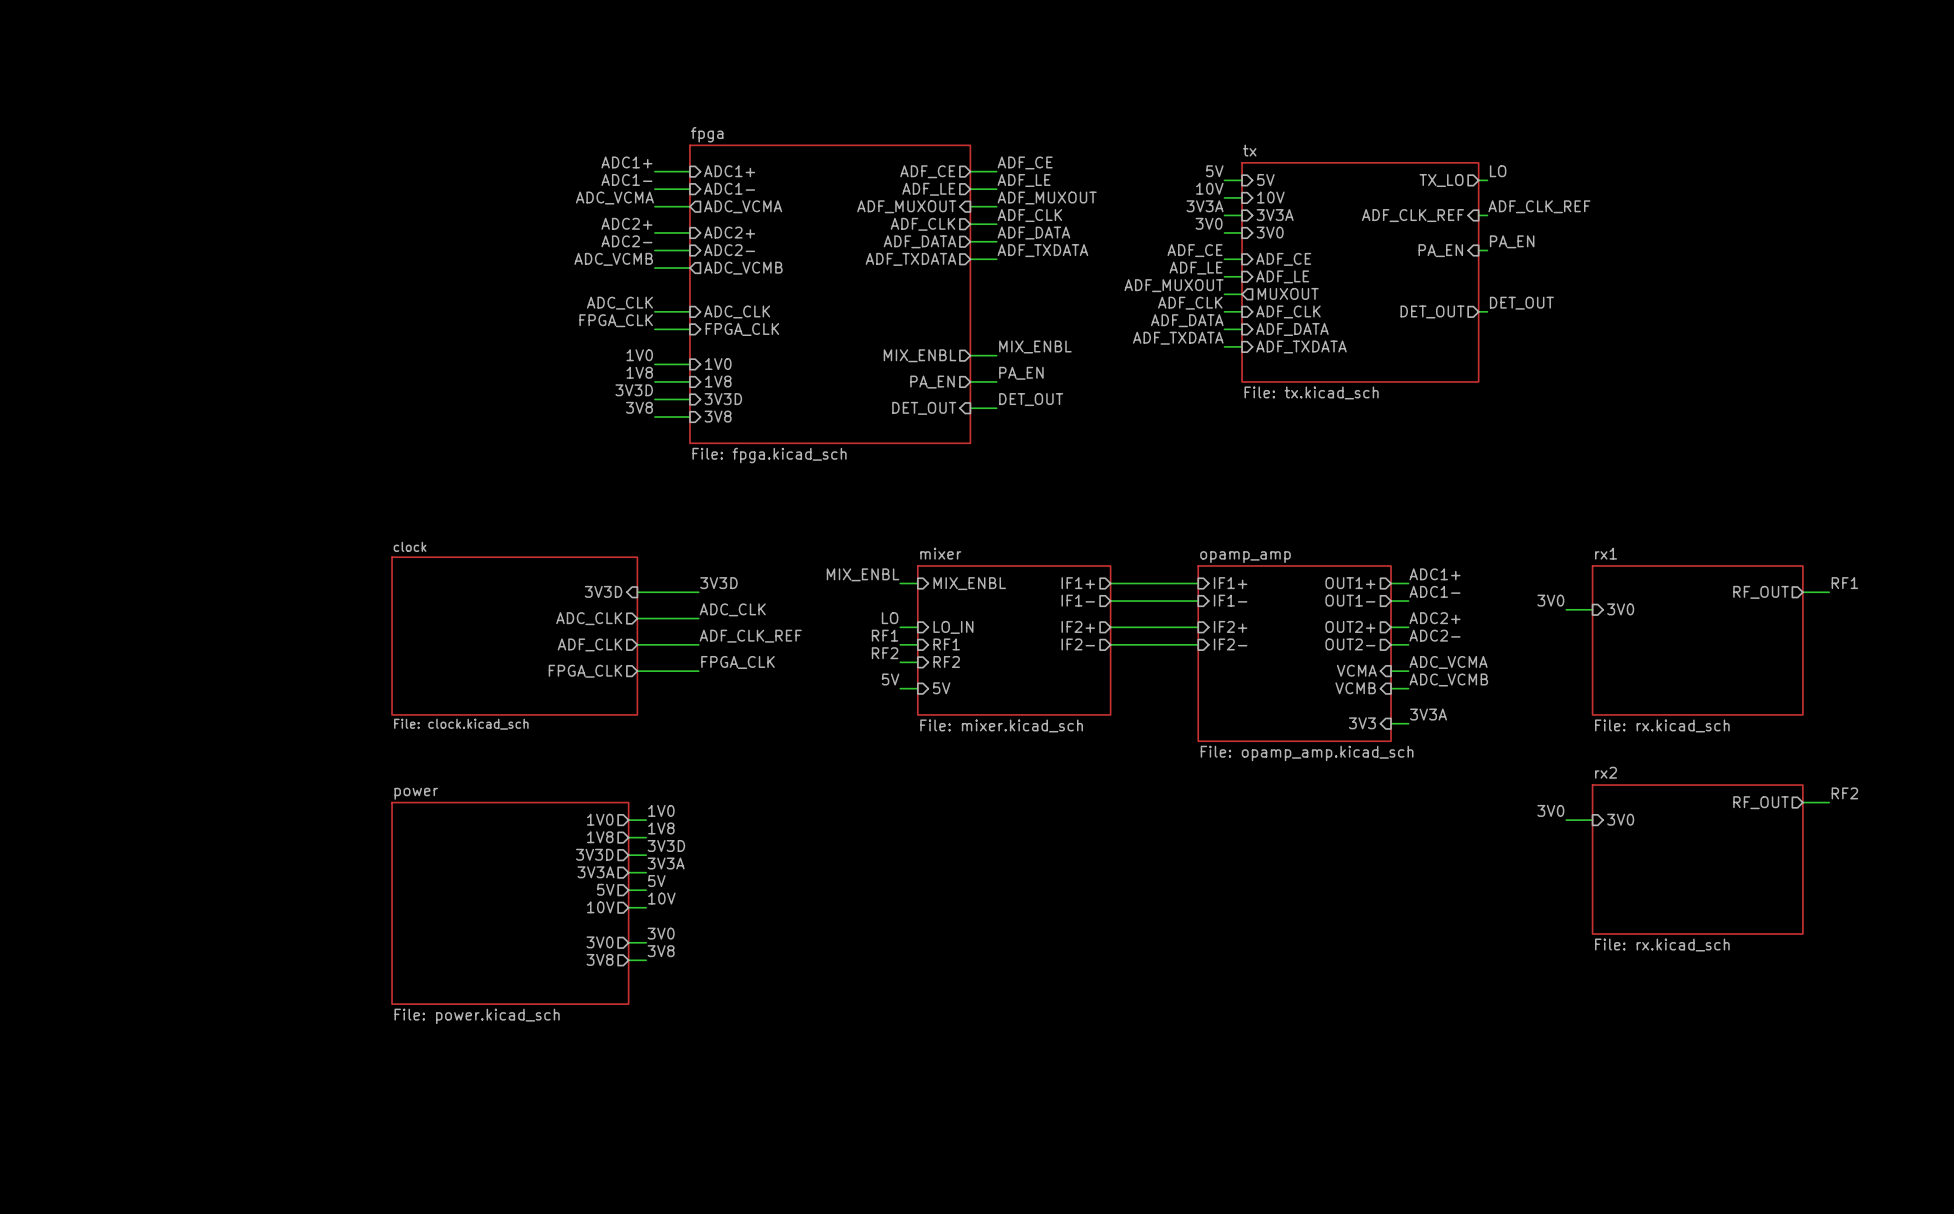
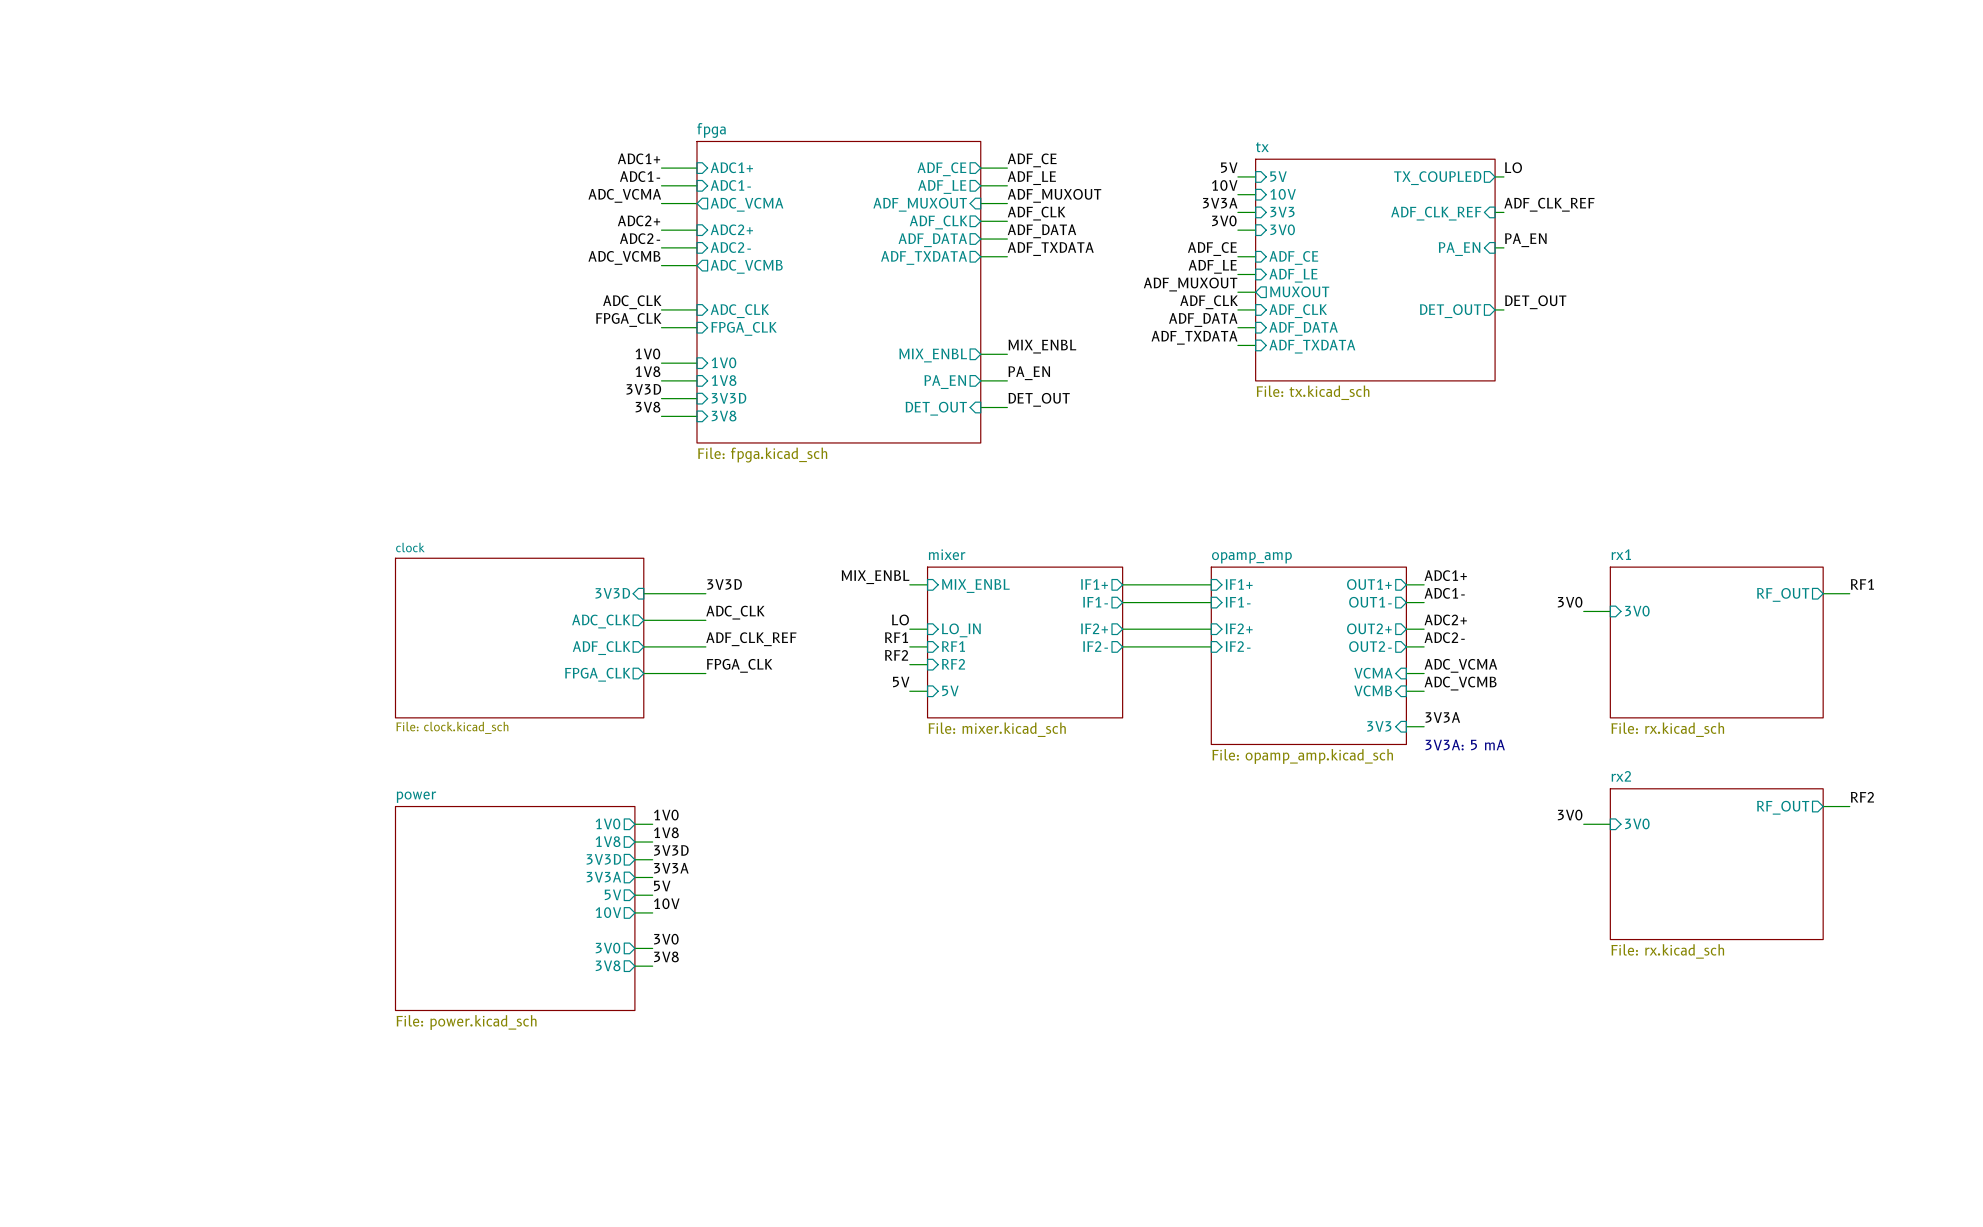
sheet pin: TX_LO (1441, 180) -> TX_COUPLED (1437, 178)
sheet pin: 3V3A (1275, 215) -> 3V3 (1282, 212)
text: none -> 3V3A: 5 mA (1465, 745)

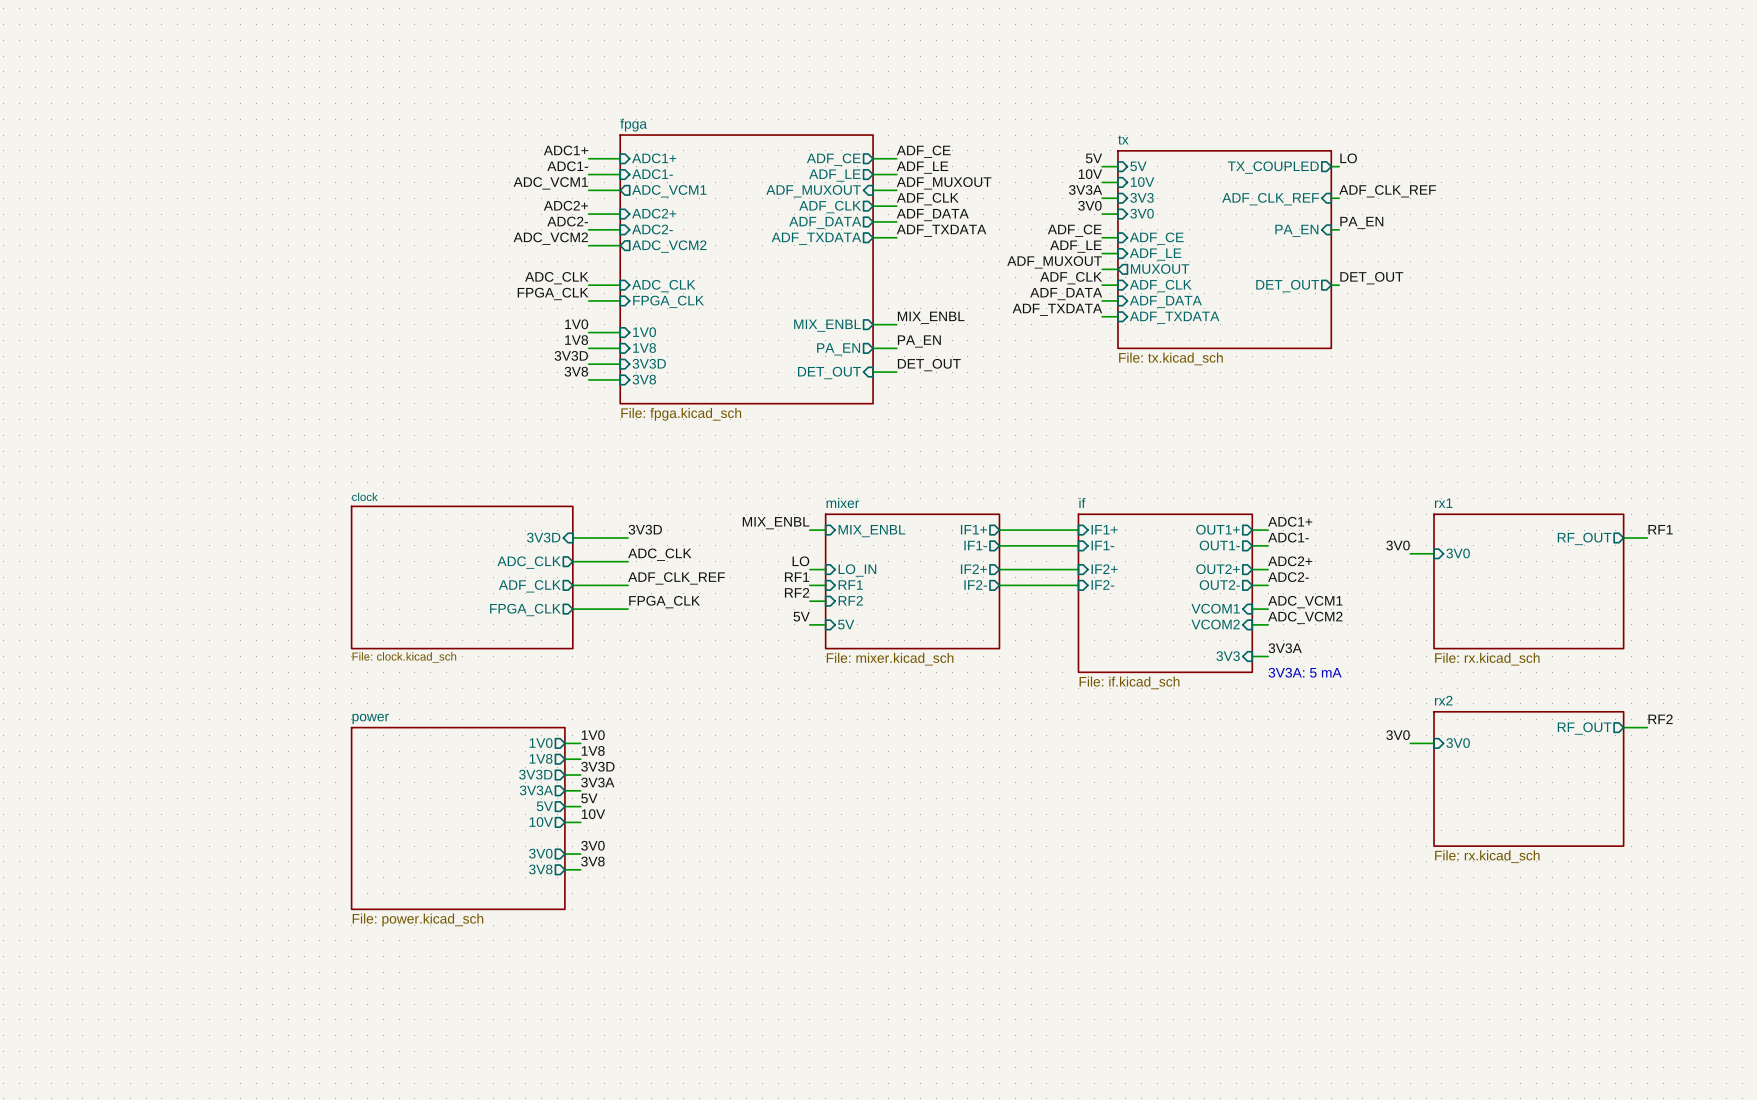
label: ADC_VCMA (624, 195) -> ADC_VCM1 (550, 183)
sheet pin: ADC_VCMA (747, 204) -> ADC_VCM1 (669, 191)
label: ADC_VCMB (624, 257) -> ADC_VCM2 (550, 238)
sheet pin: ADC_VCMB (746, 266) -> ADC_VCM2 (669, 246)
sheet opamp_amp name: opamp_amp (1251, 557) -> if (1082, 502)
label: ADC_VCMA (1460, 665) -> ADC_VCM1 (1305, 602)
sheet pin: VCMA (1373, 673) -> VCOM1 (1215, 608)
label: ADC_VCMB (1460, 683) -> ADC_VCM2 (1305, 617)
sheet pin: VCMB (1373, 690) -> VCOM2 (1215, 624)
sheet opamp_amp value: File: opamp_amp.kicad_sch (1302, 756) -> File: if.kicad_sch (1129, 682)

